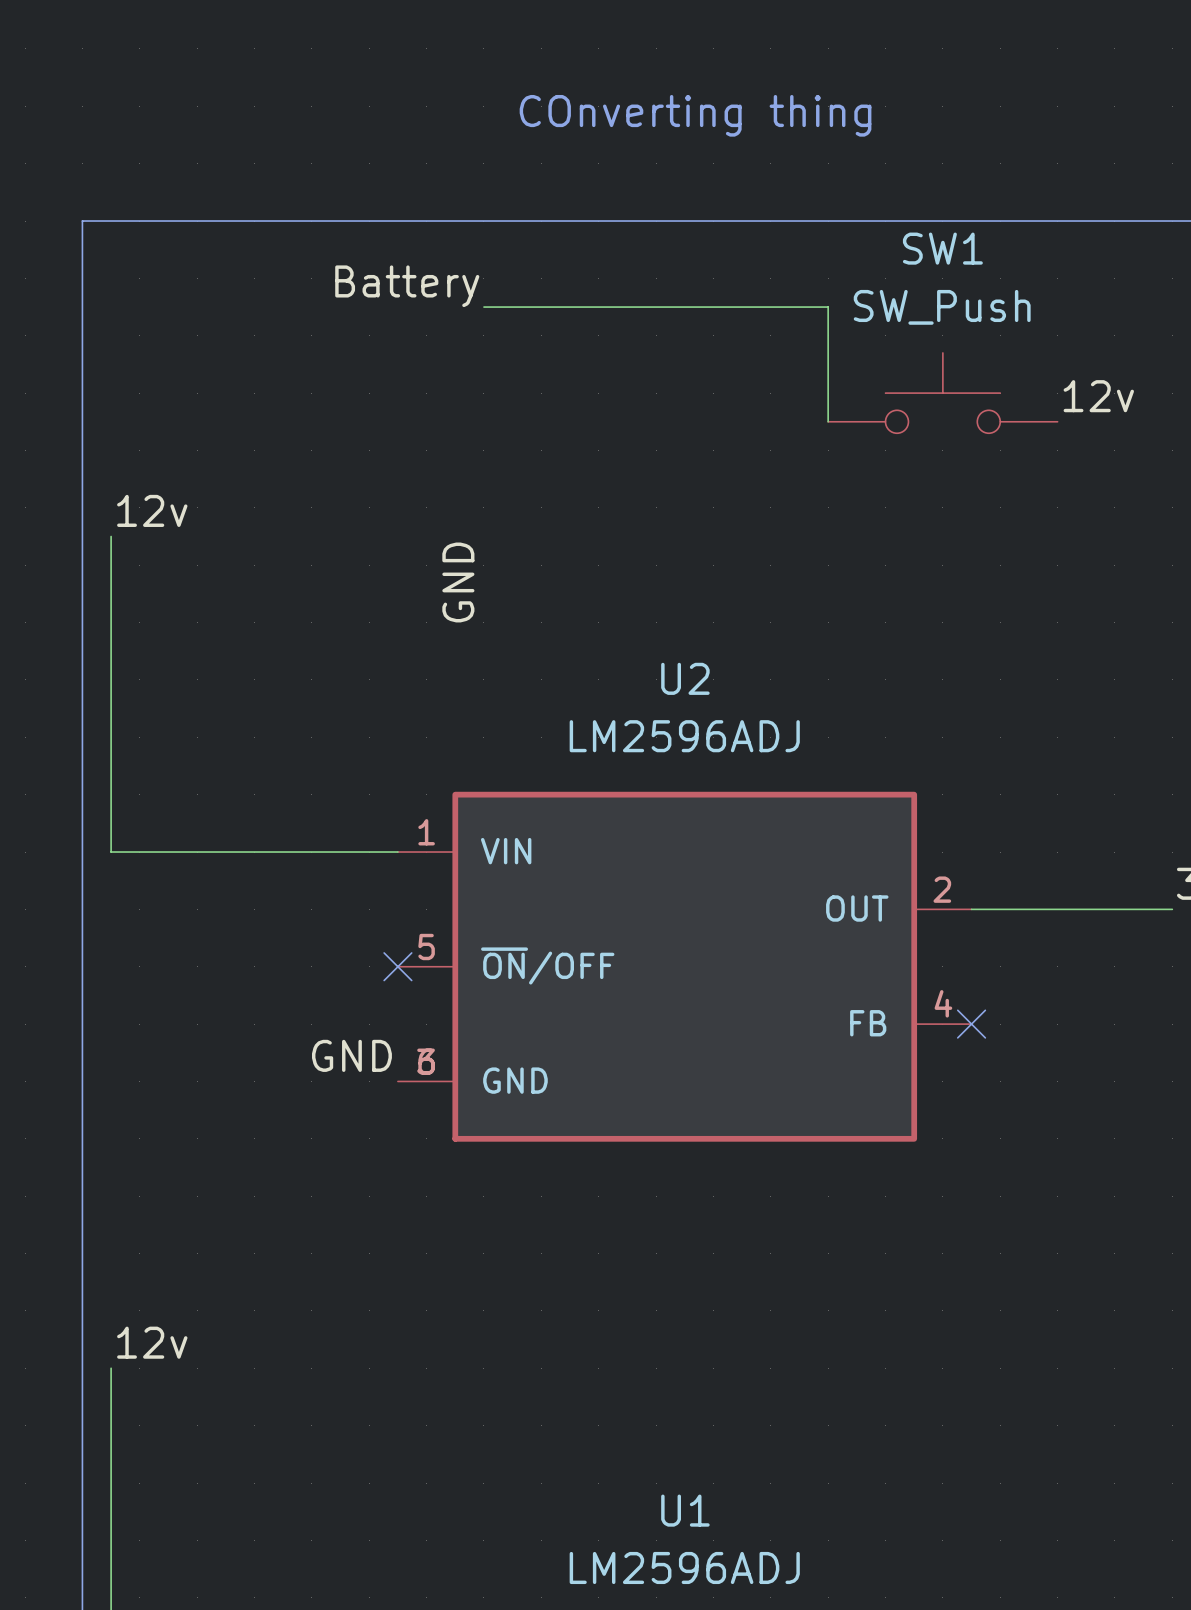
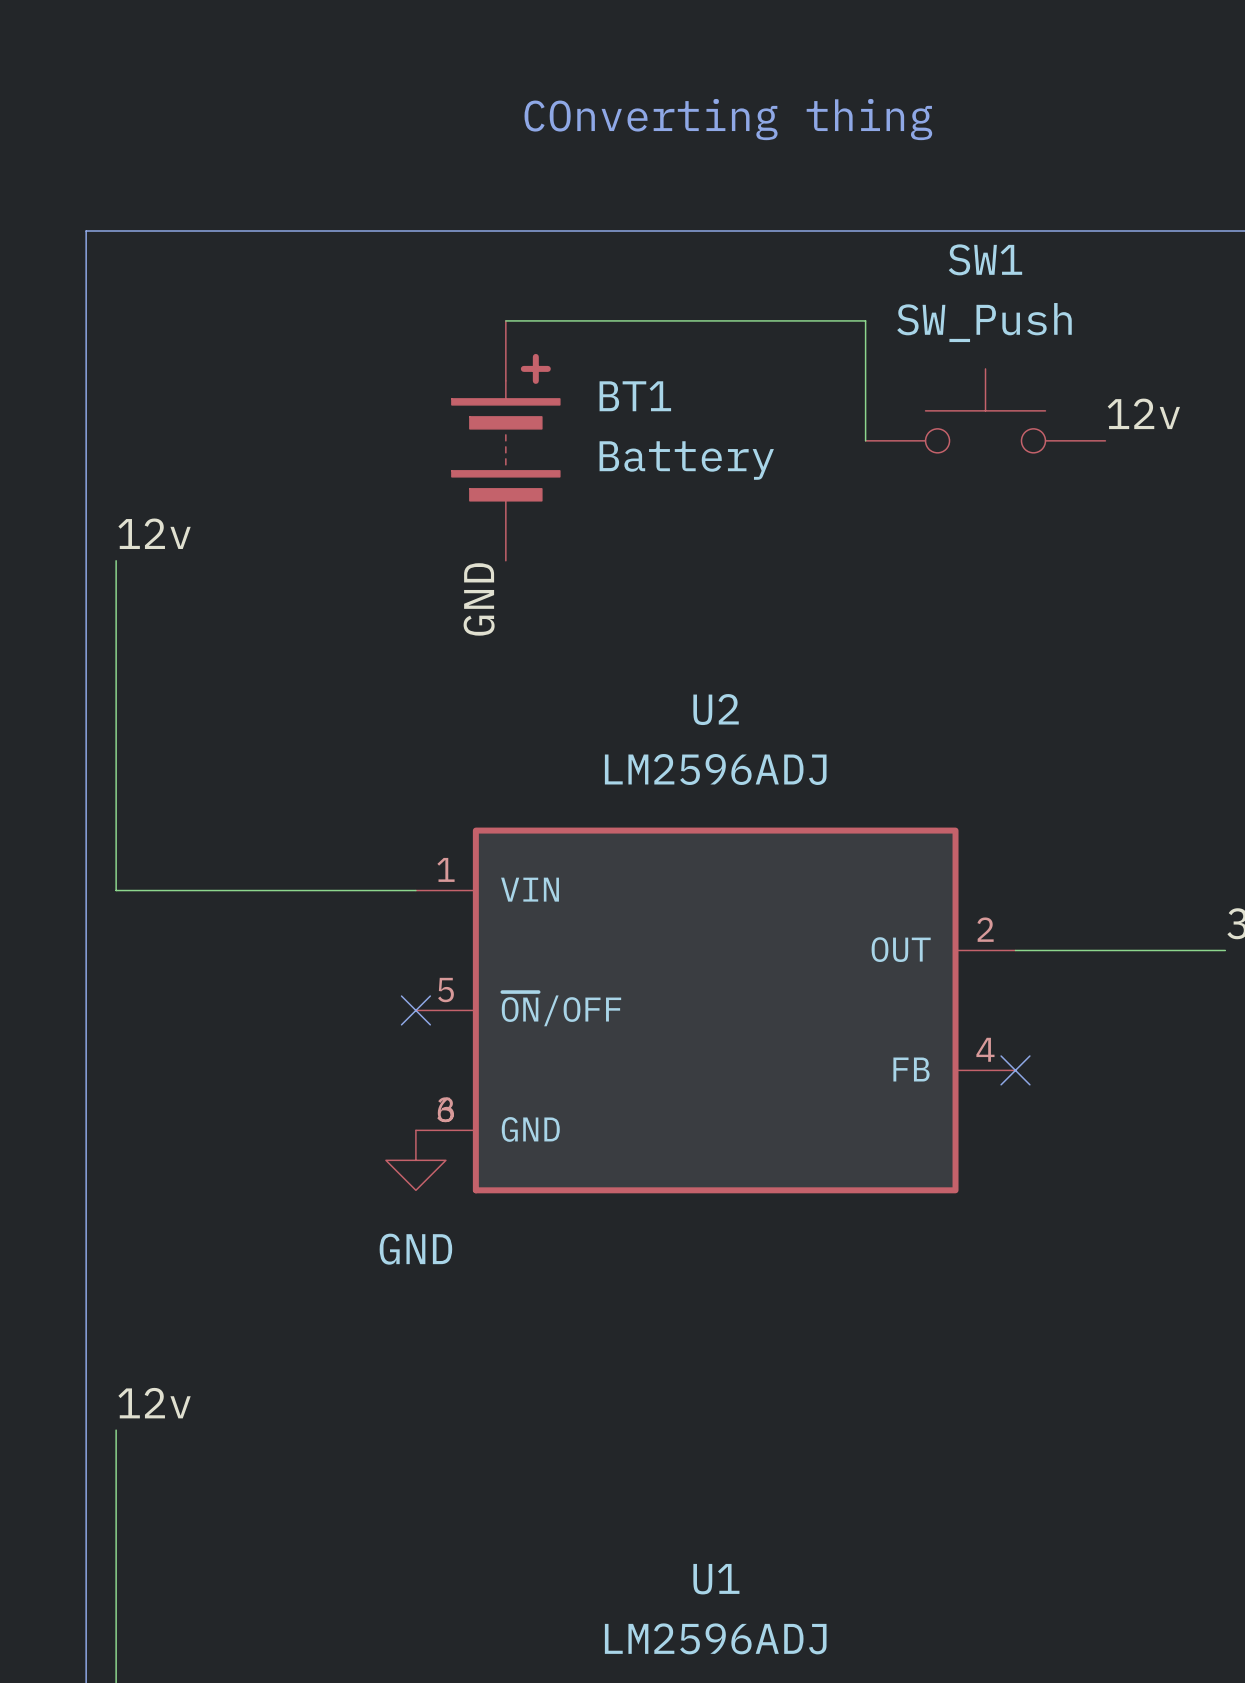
label: Battery (407, 286) -> none
BT1: none -> Battery (505, 440)
label: GND (351, 1055) -> none
power symbol: none -> GND (415, 1160)

